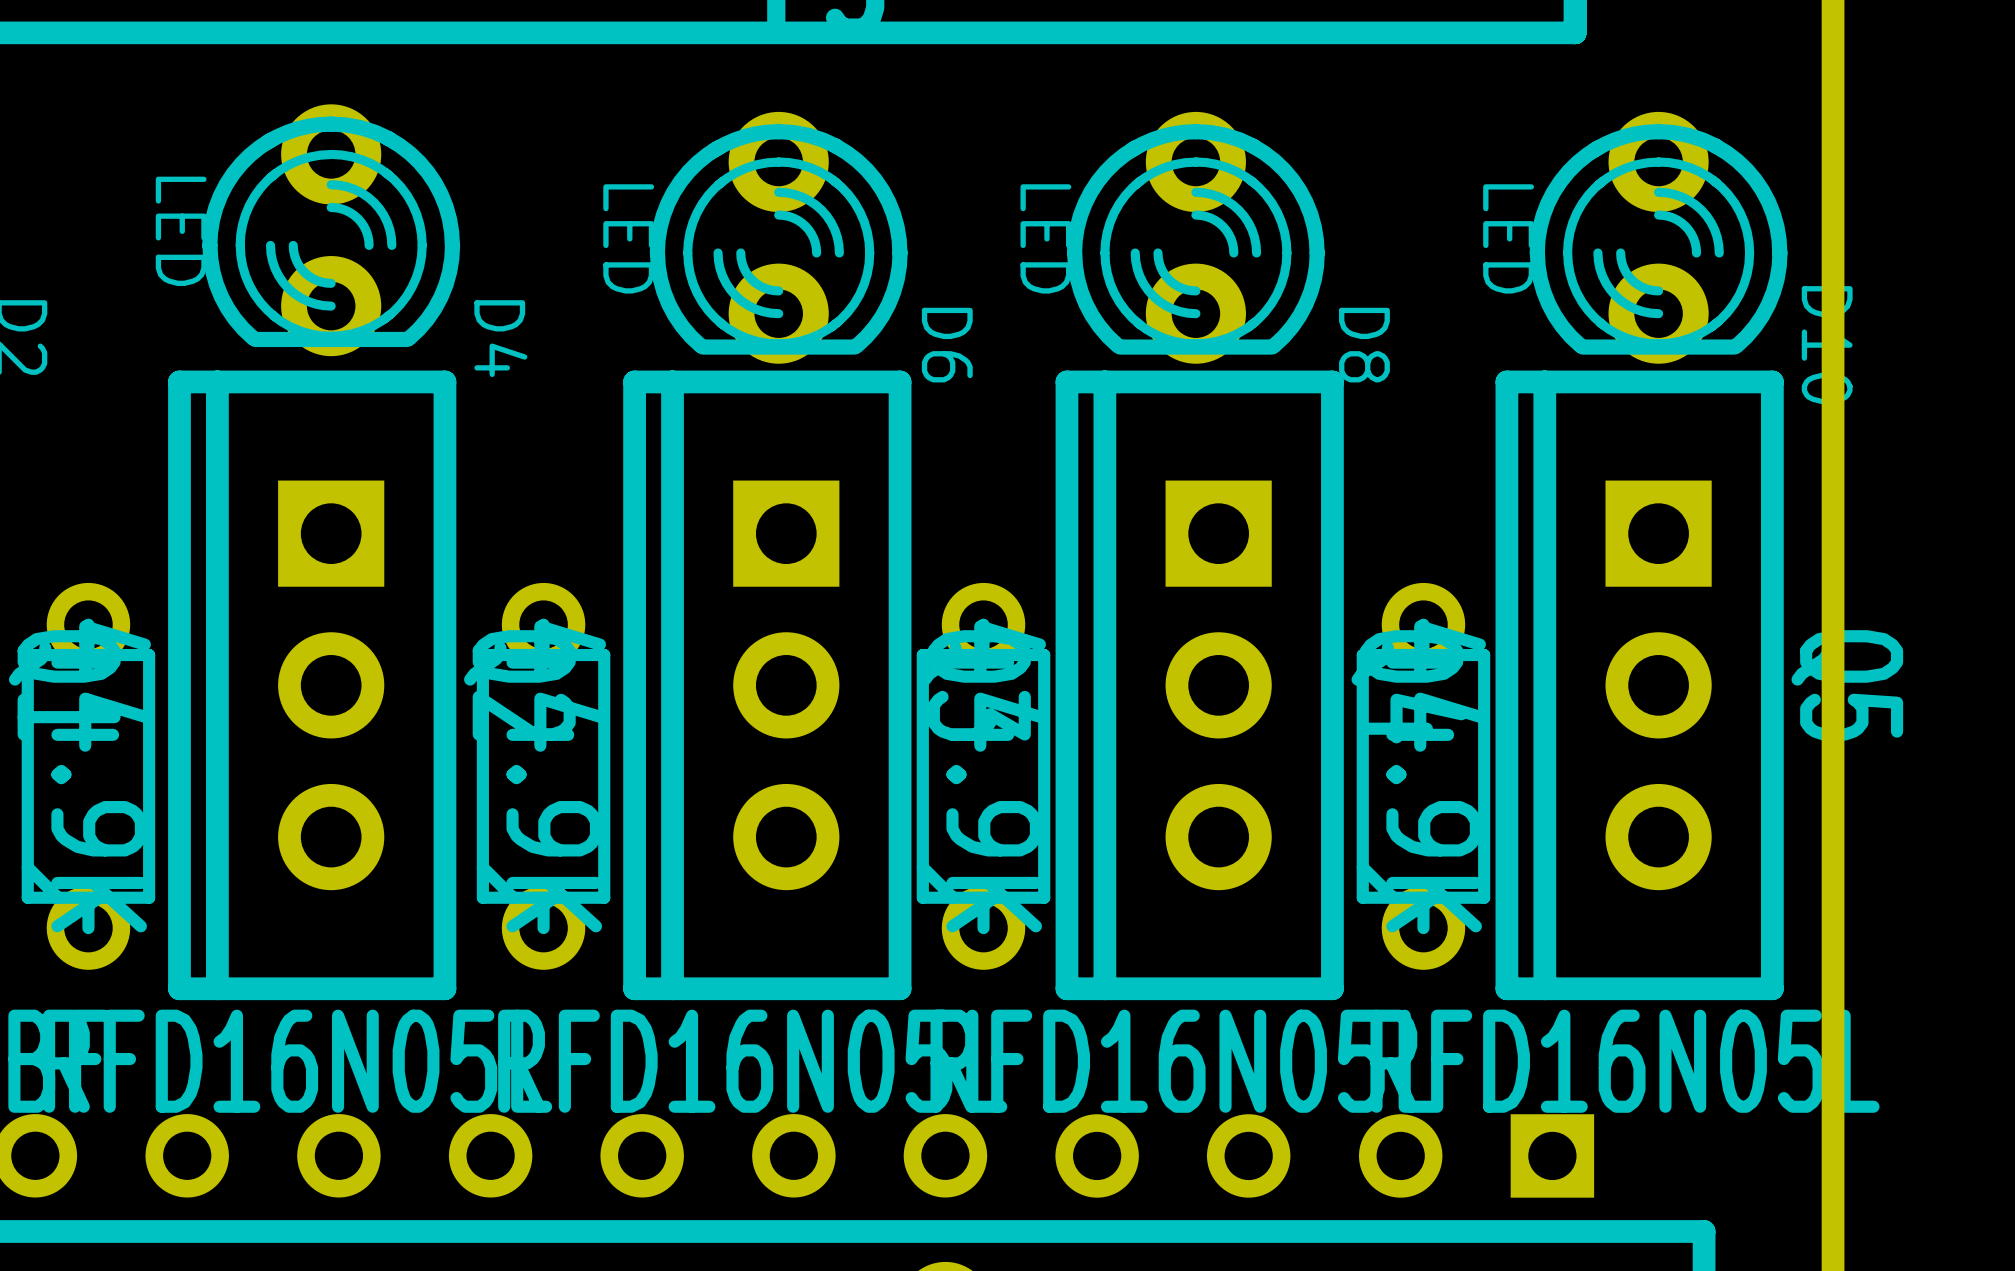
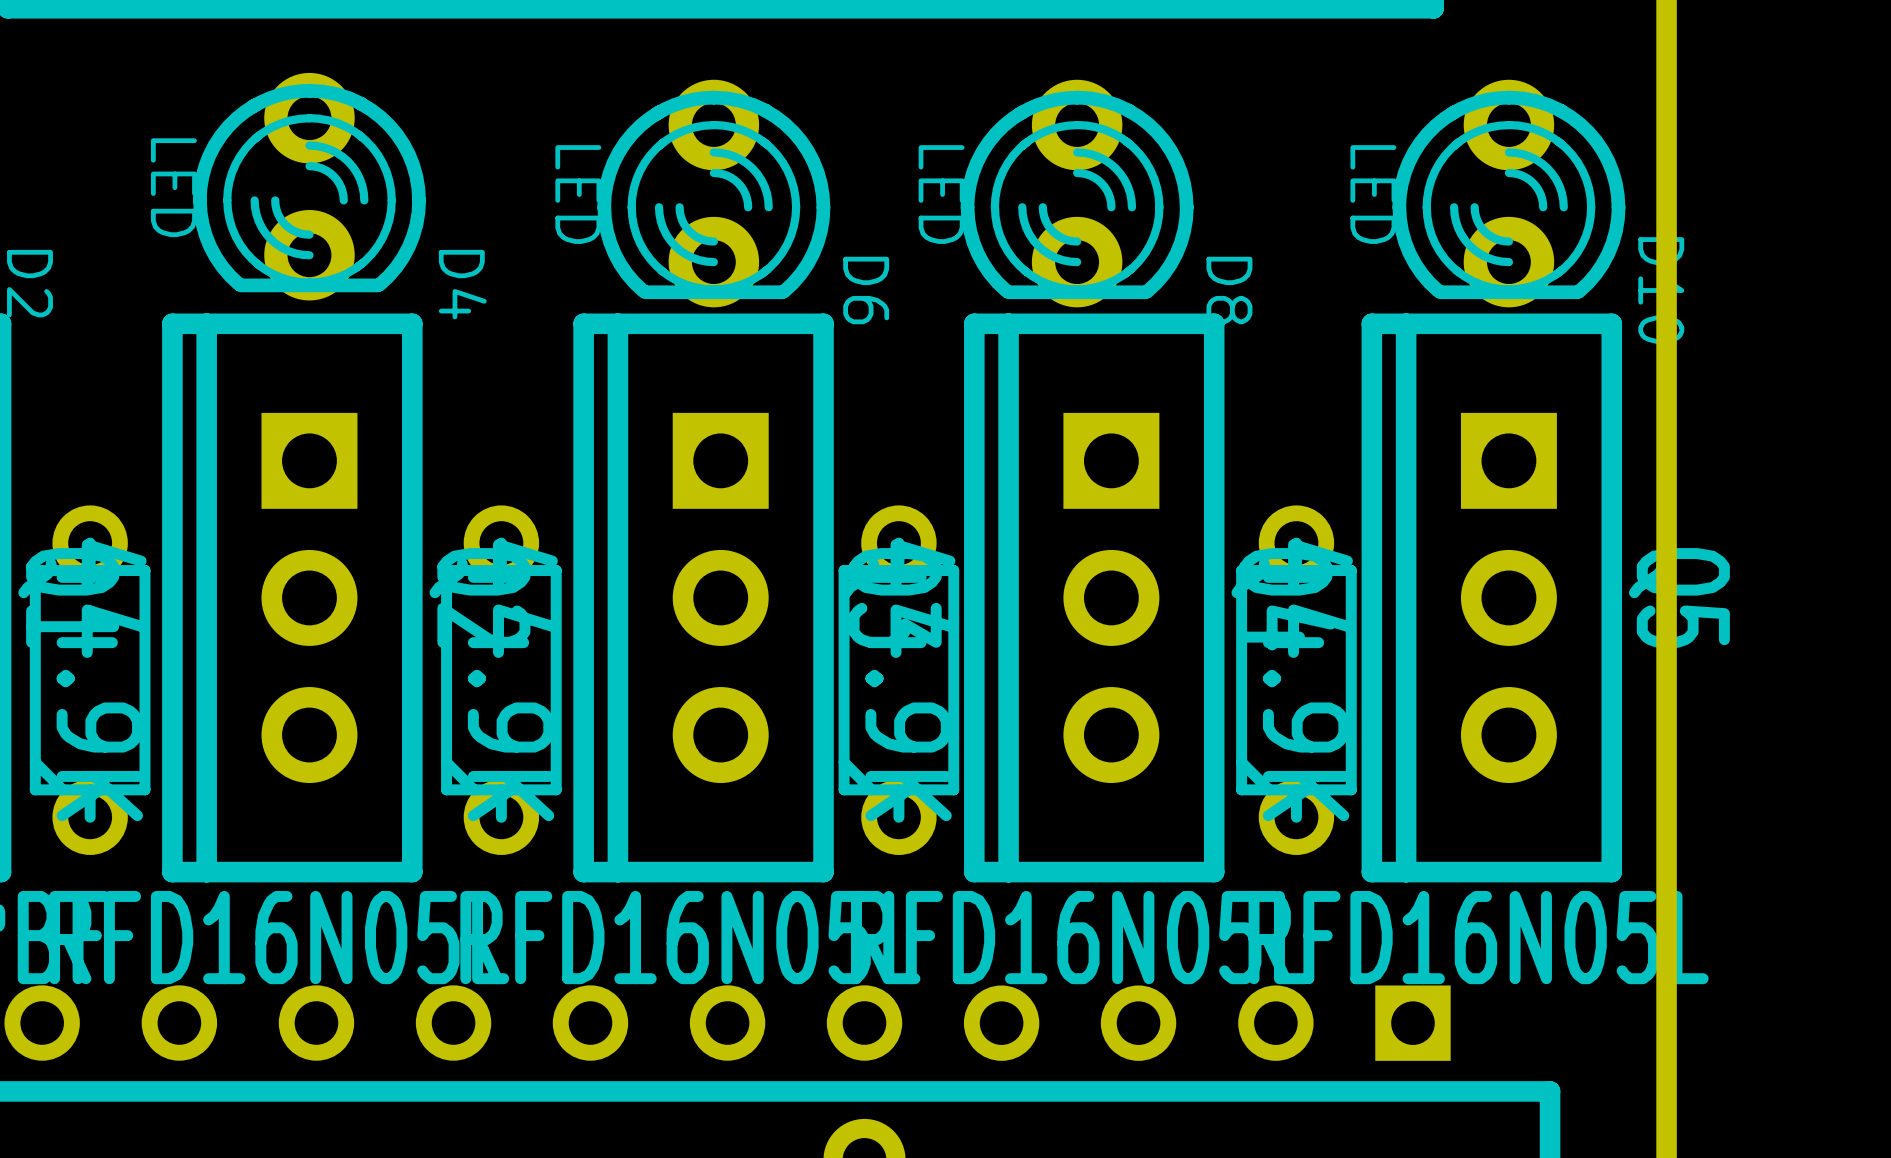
D8 position: (1195, 237) -> (1077, 193)

